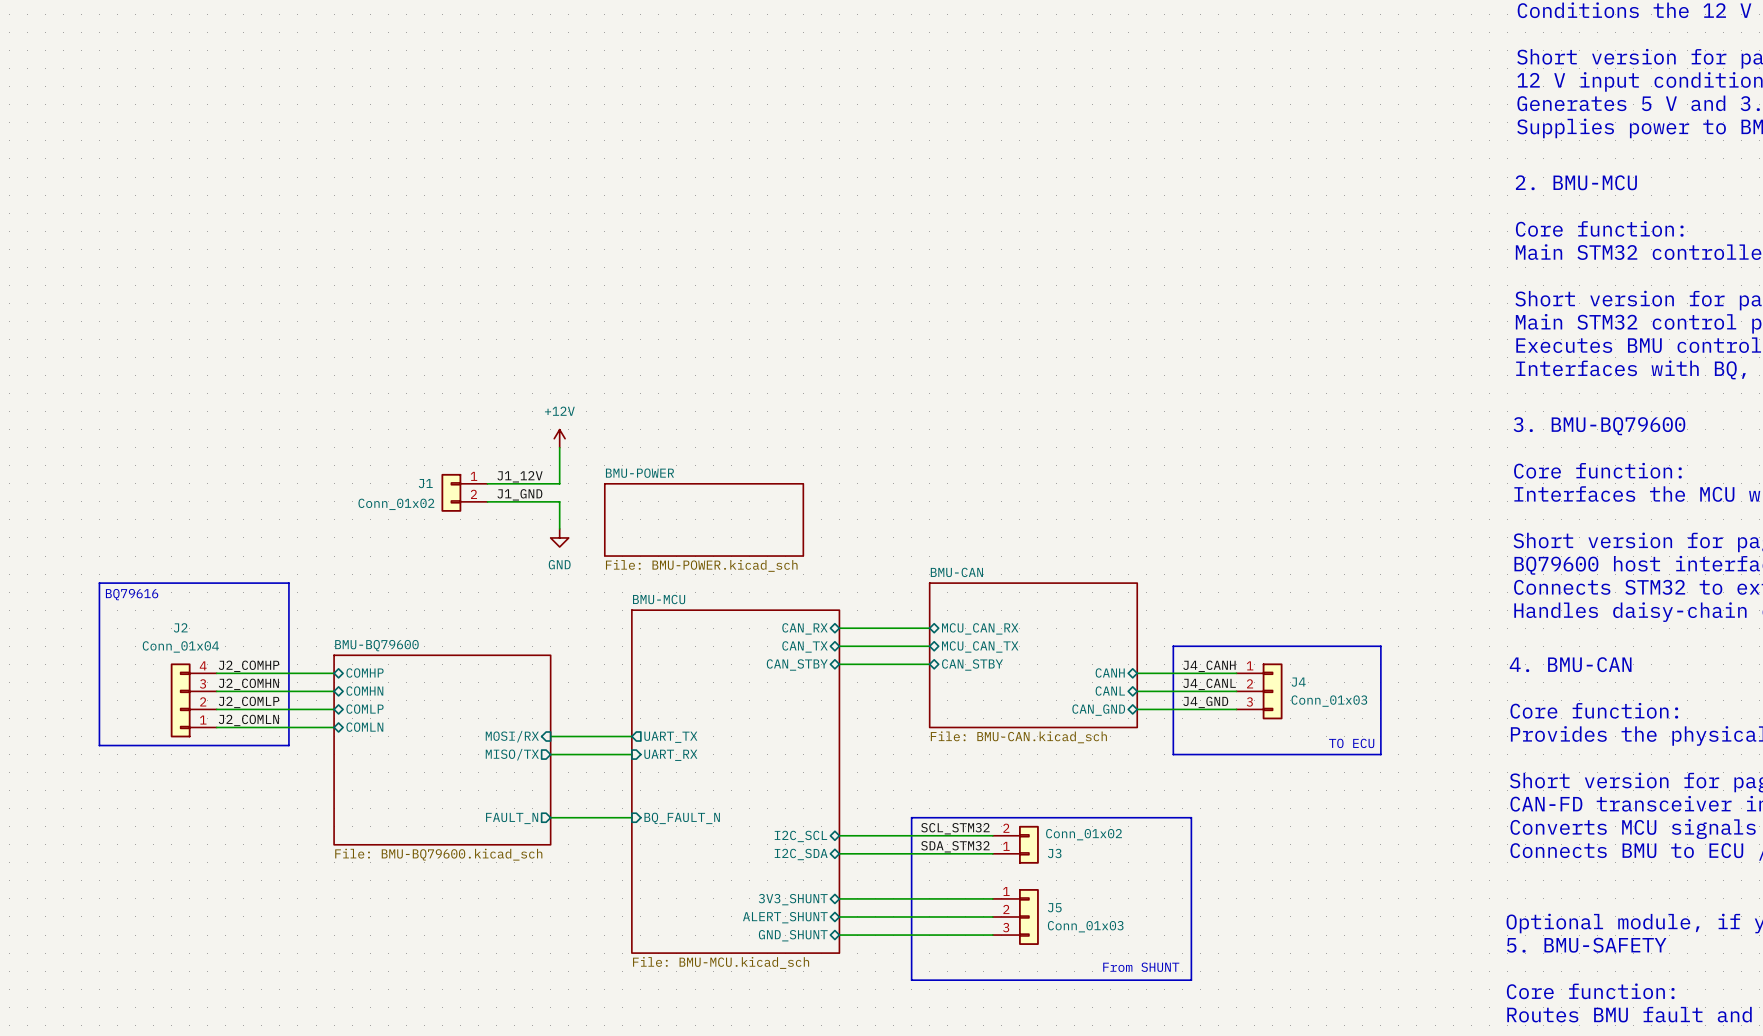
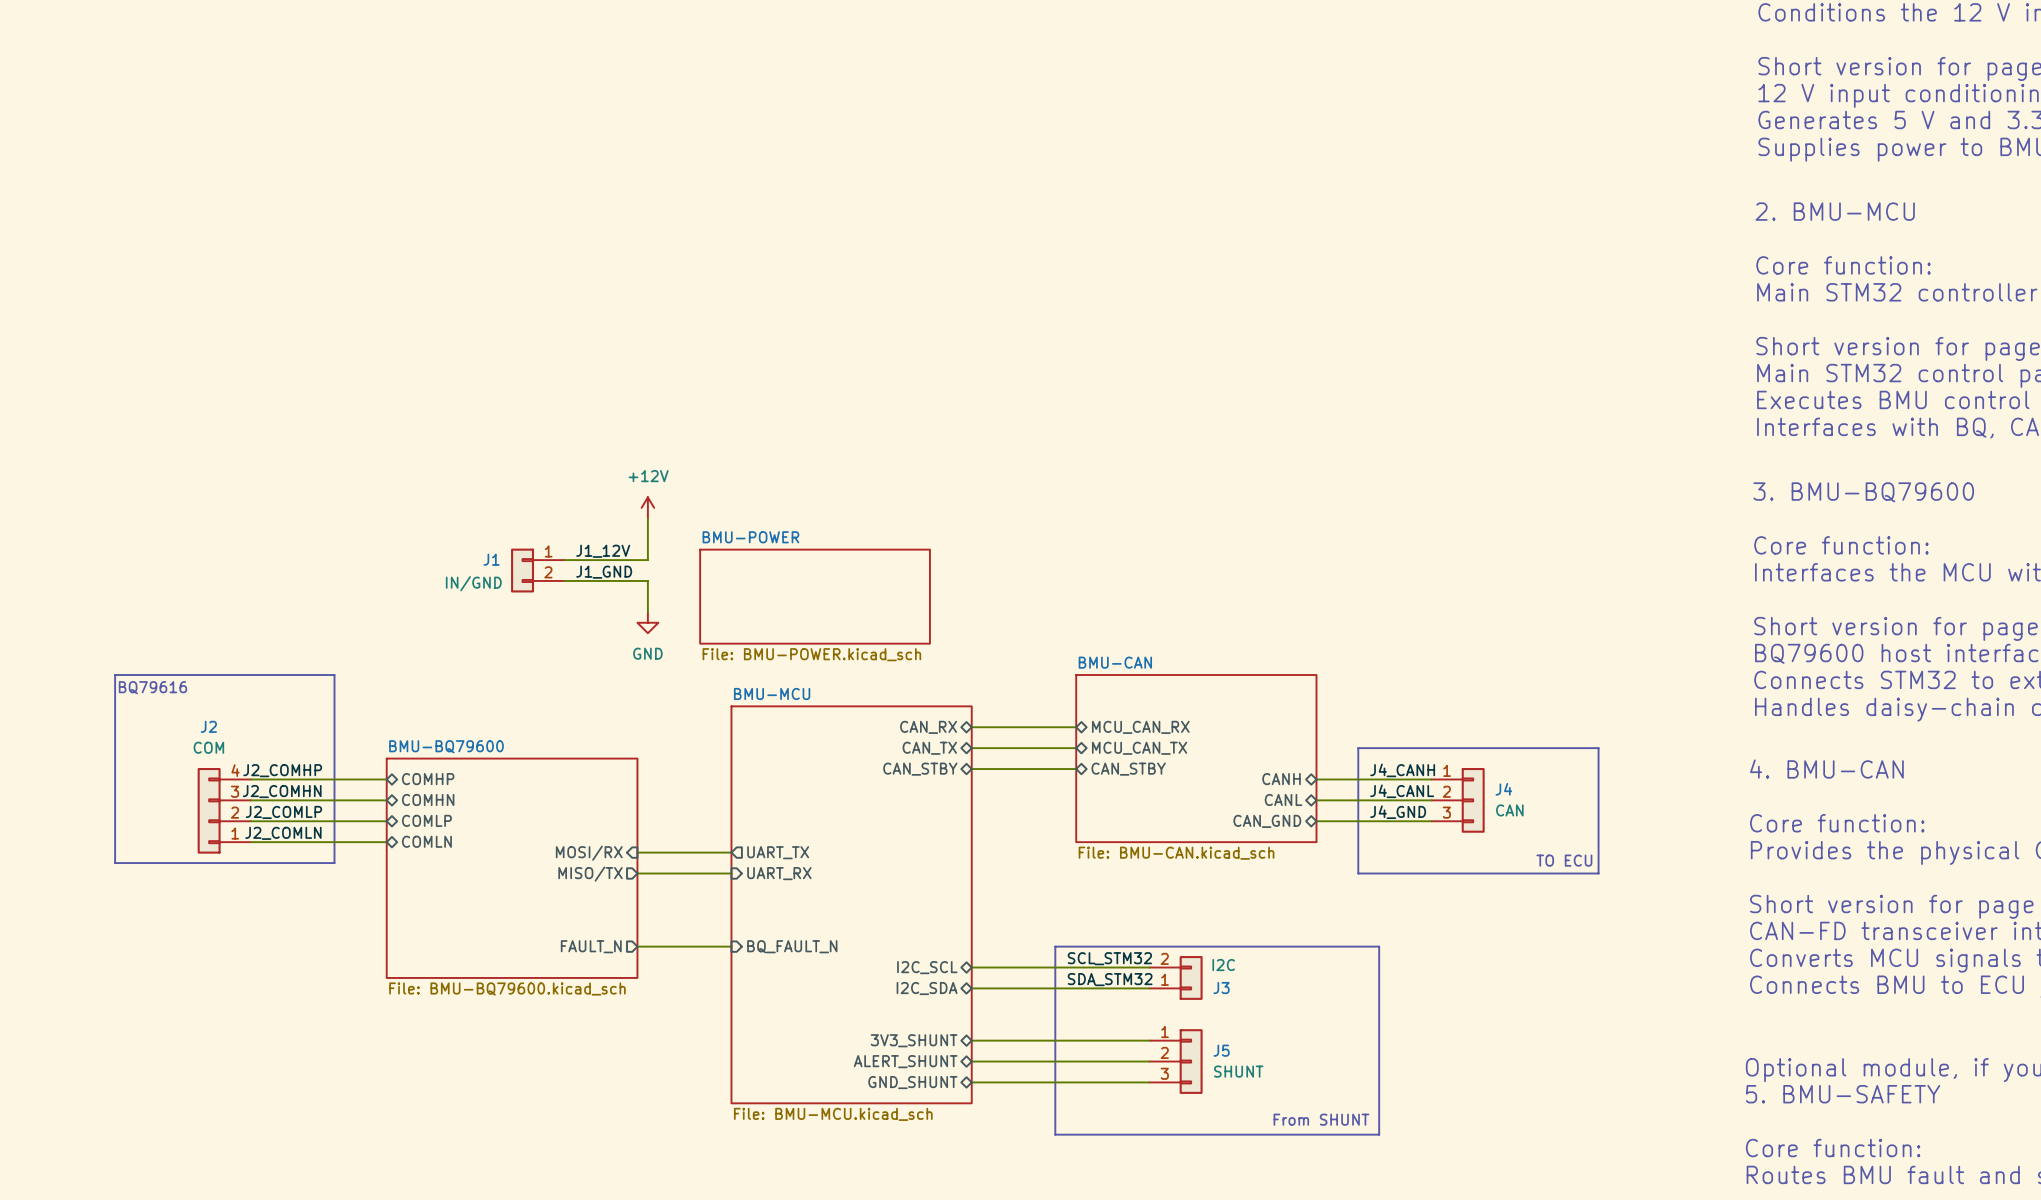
sheet BMU-POWER shape: [604, 483, 804, 557] -> [699, 549, 931, 645]
J1 value: Conn_01x02 (396, 504) -> IN/GND (473, 583)
J2 value: Conn_01x04 (180, 646) -> COM (208, 747)
J4 value: Conn_01x03 (1329, 701) -> CAN (1509, 810)
J3 value: Conn_01x02 (1084, 834) -> I2C (1223, 965)
J5 value: Conn_01x03 (1085, 926) -> SHUNT (1238, 1071)

